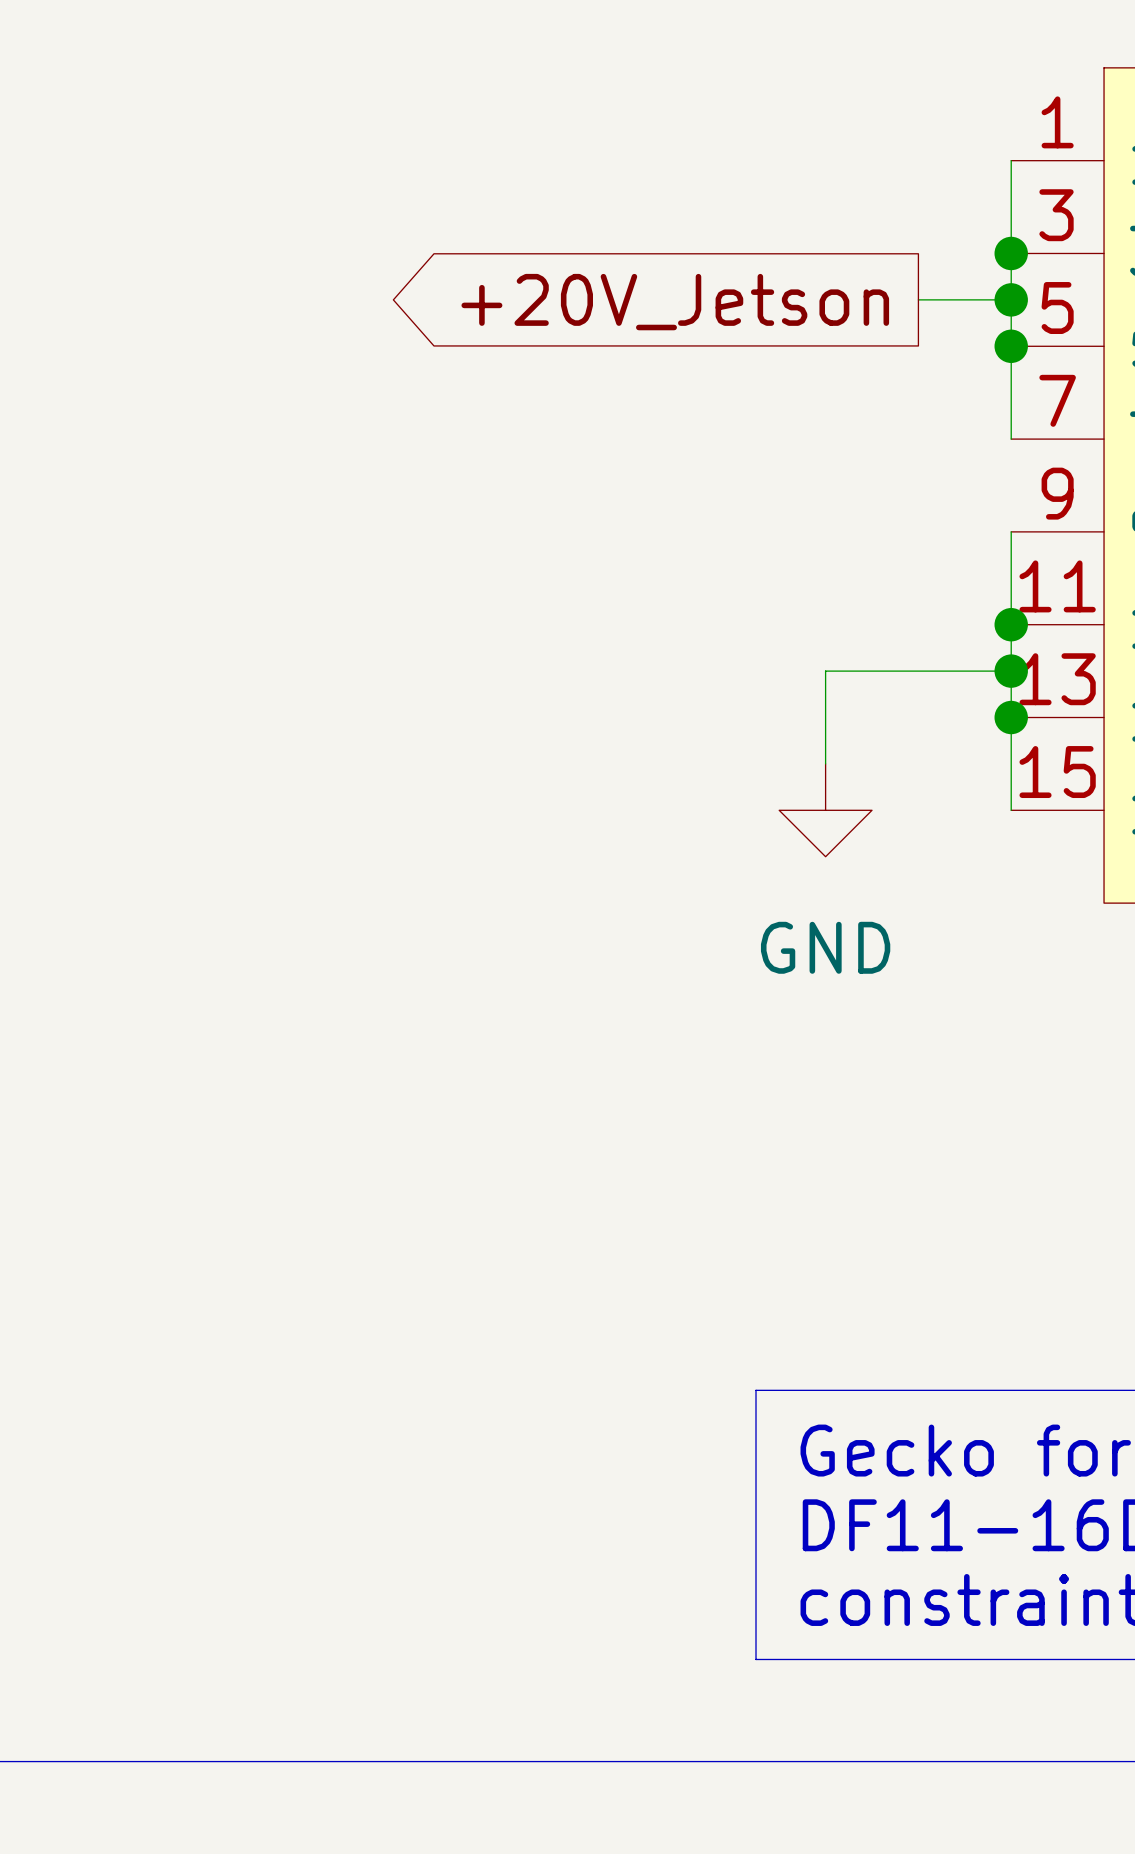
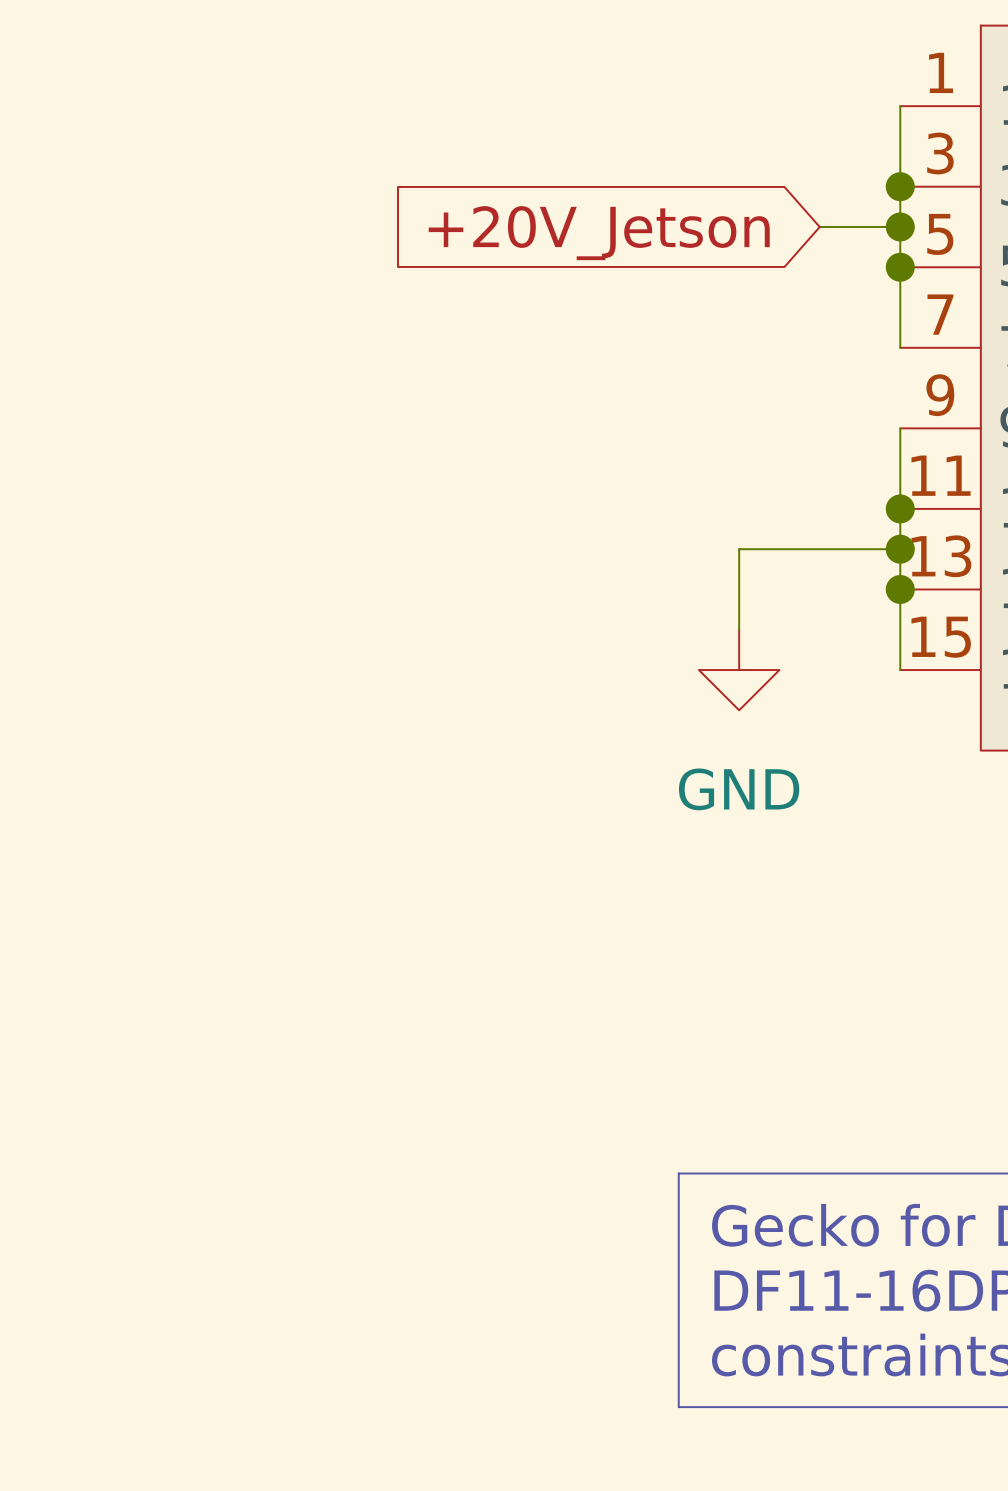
global label shape: output (675, 302) -> input (599, 233)

